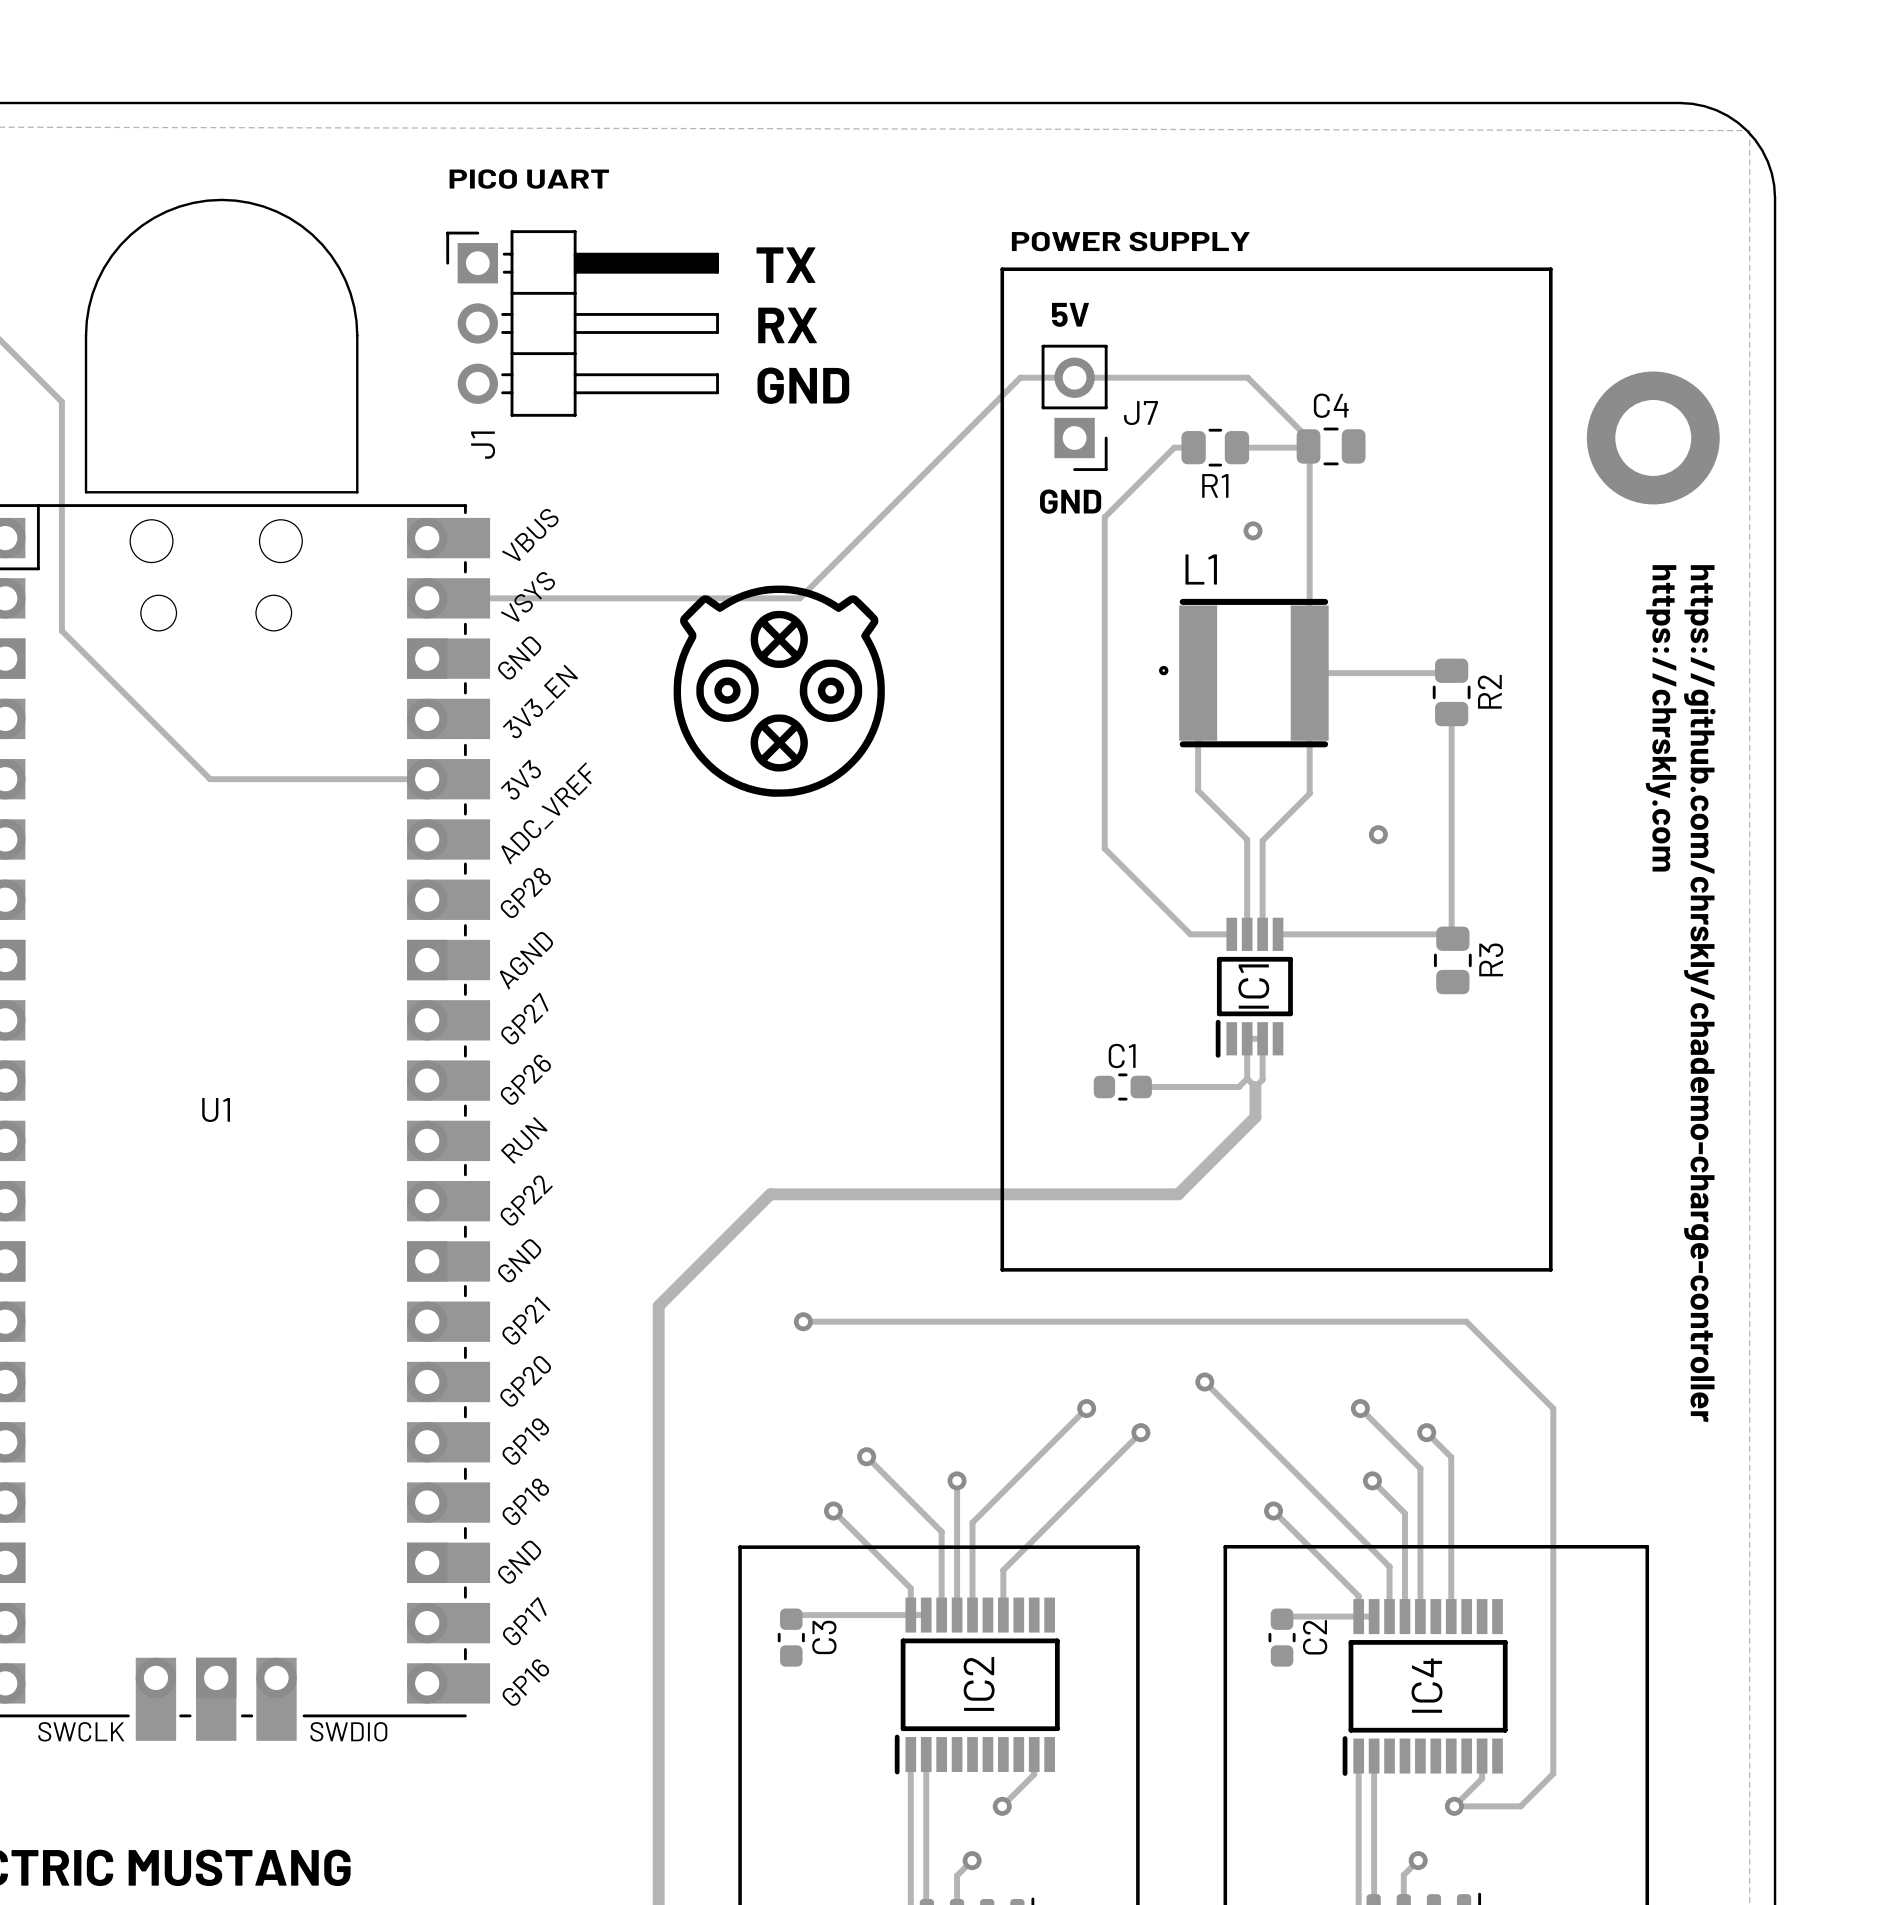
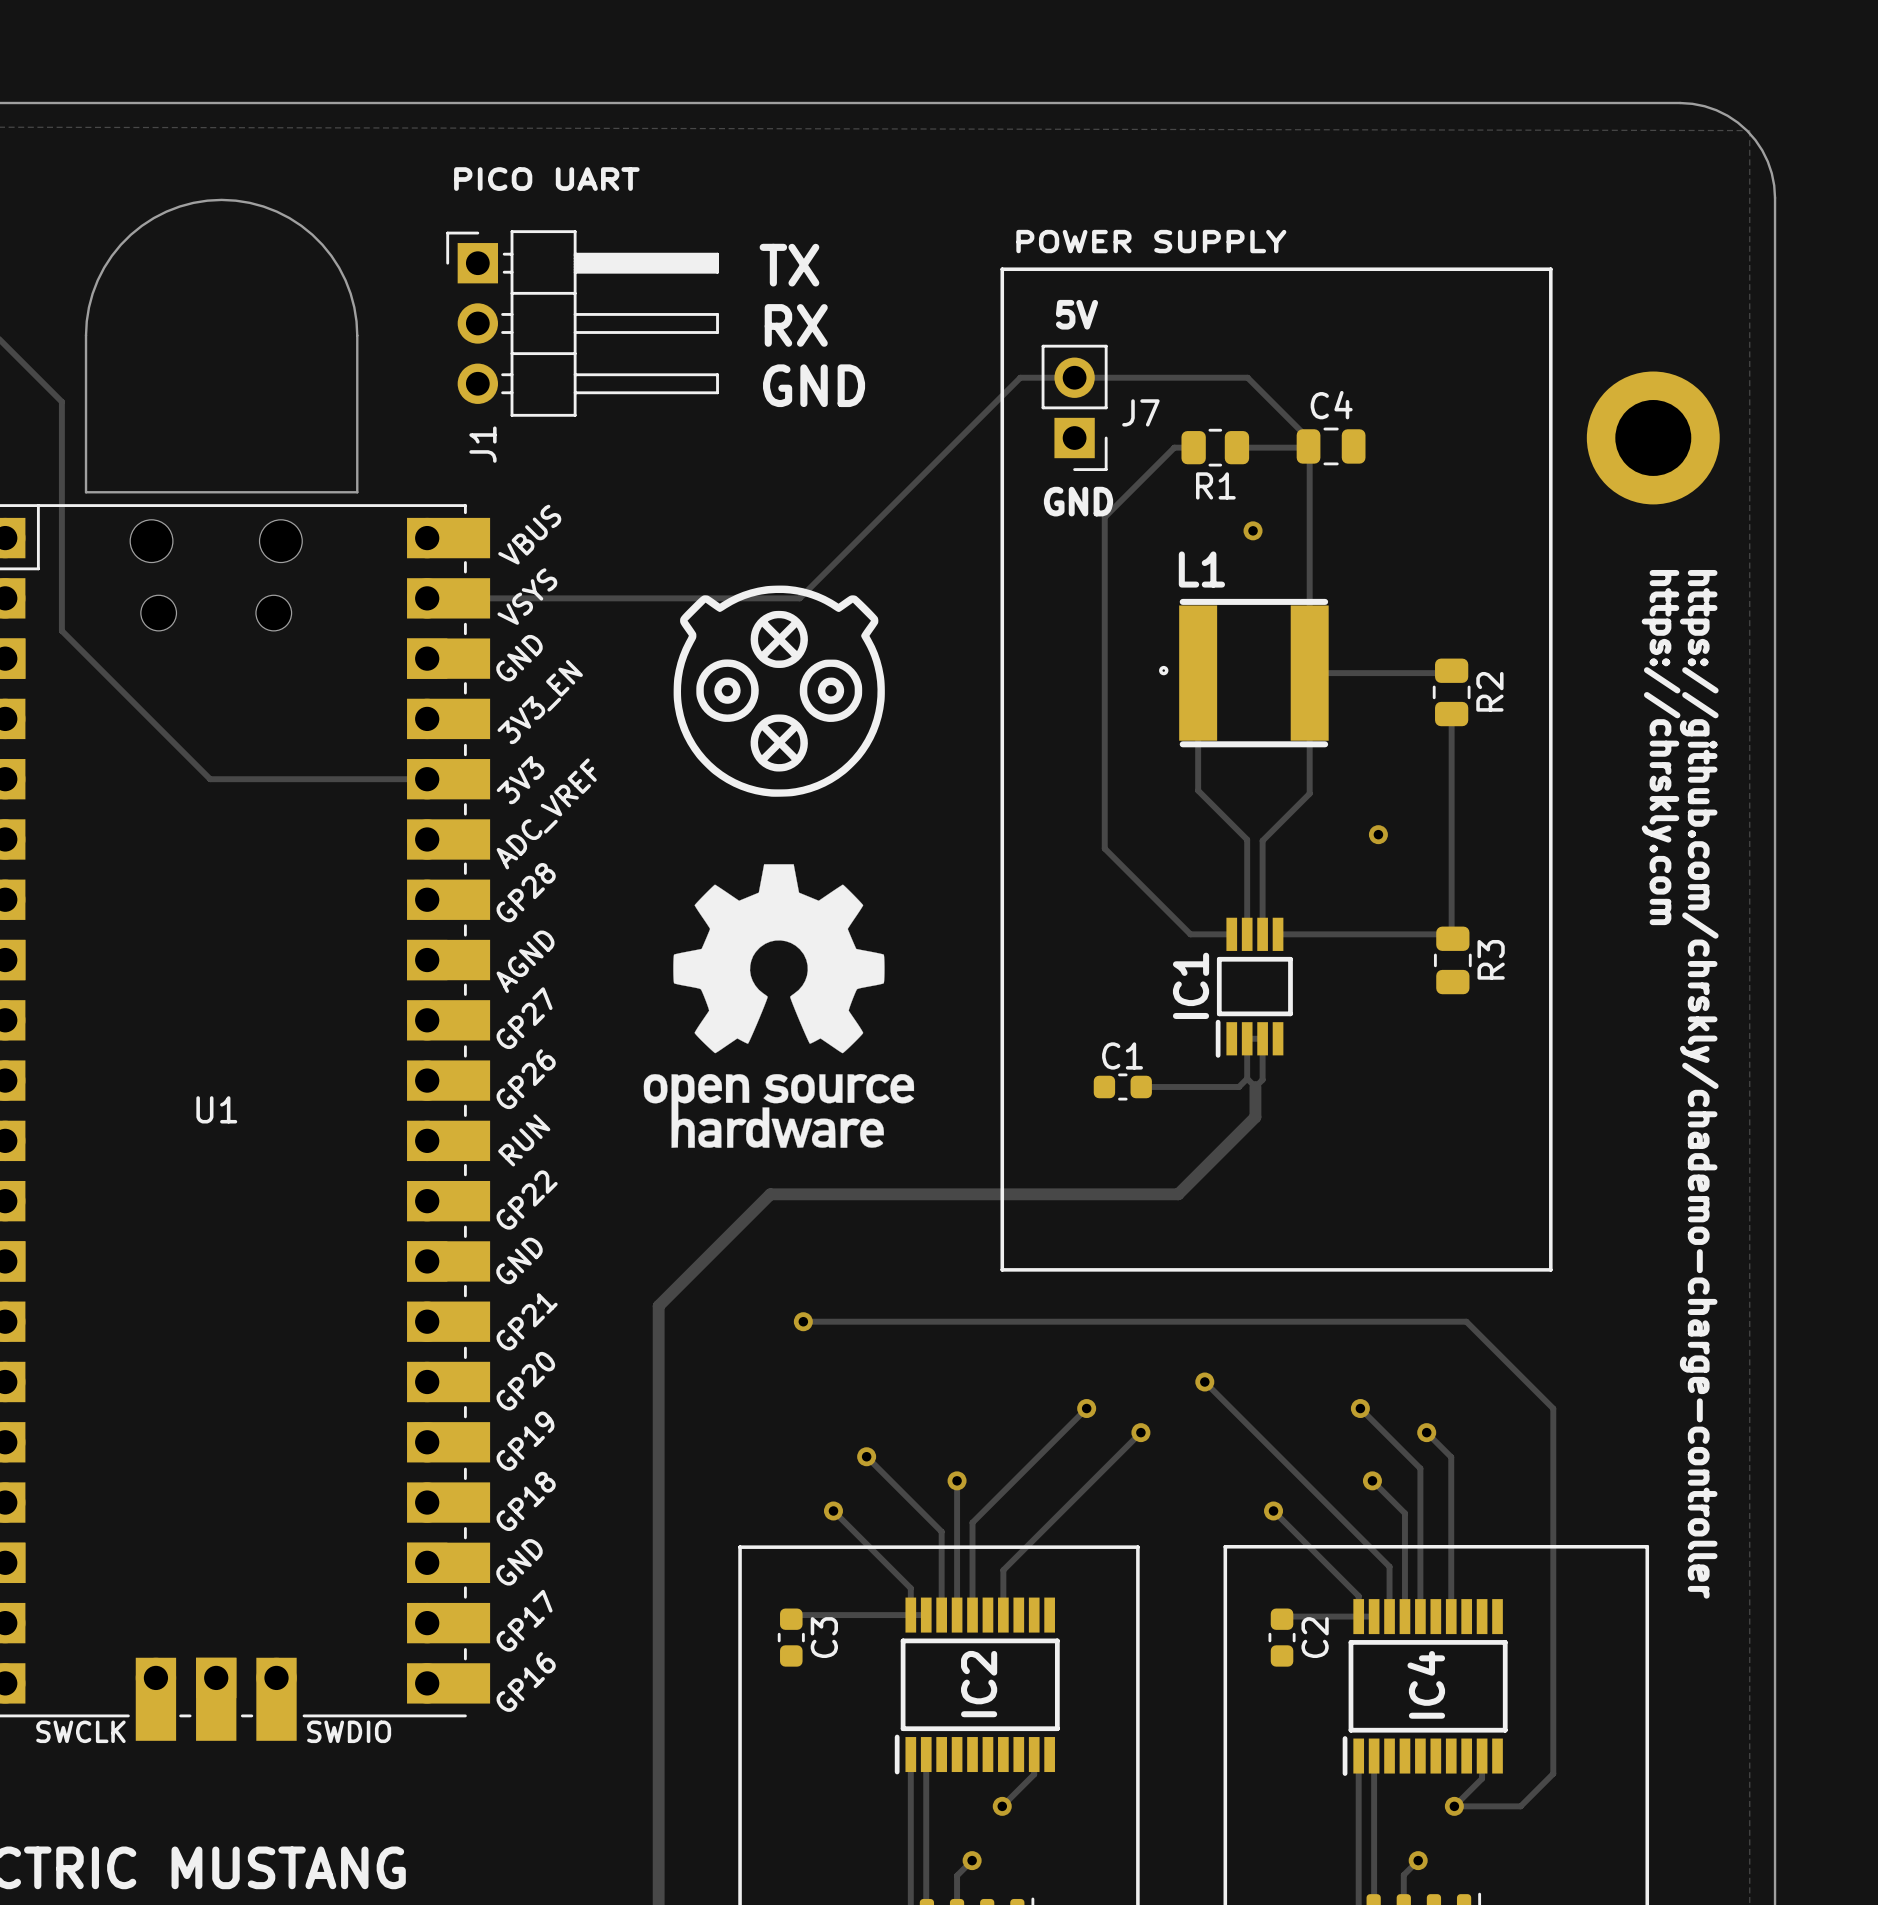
drawing: none -> [643, 864, 915, 1148]
IC1 name position: IC1 (1253, 986) -> IC1 (1191, 985)

